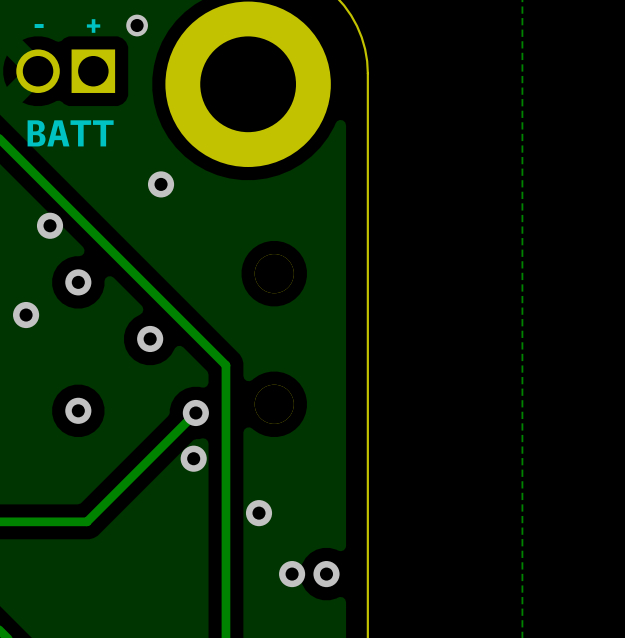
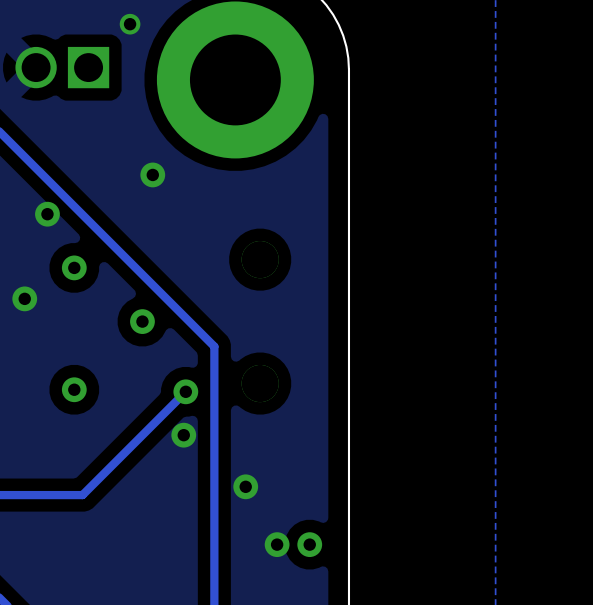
text: - (39, 26) -> none
text: + (93, 26) -> none
text: BATT (70, 133) -> none

